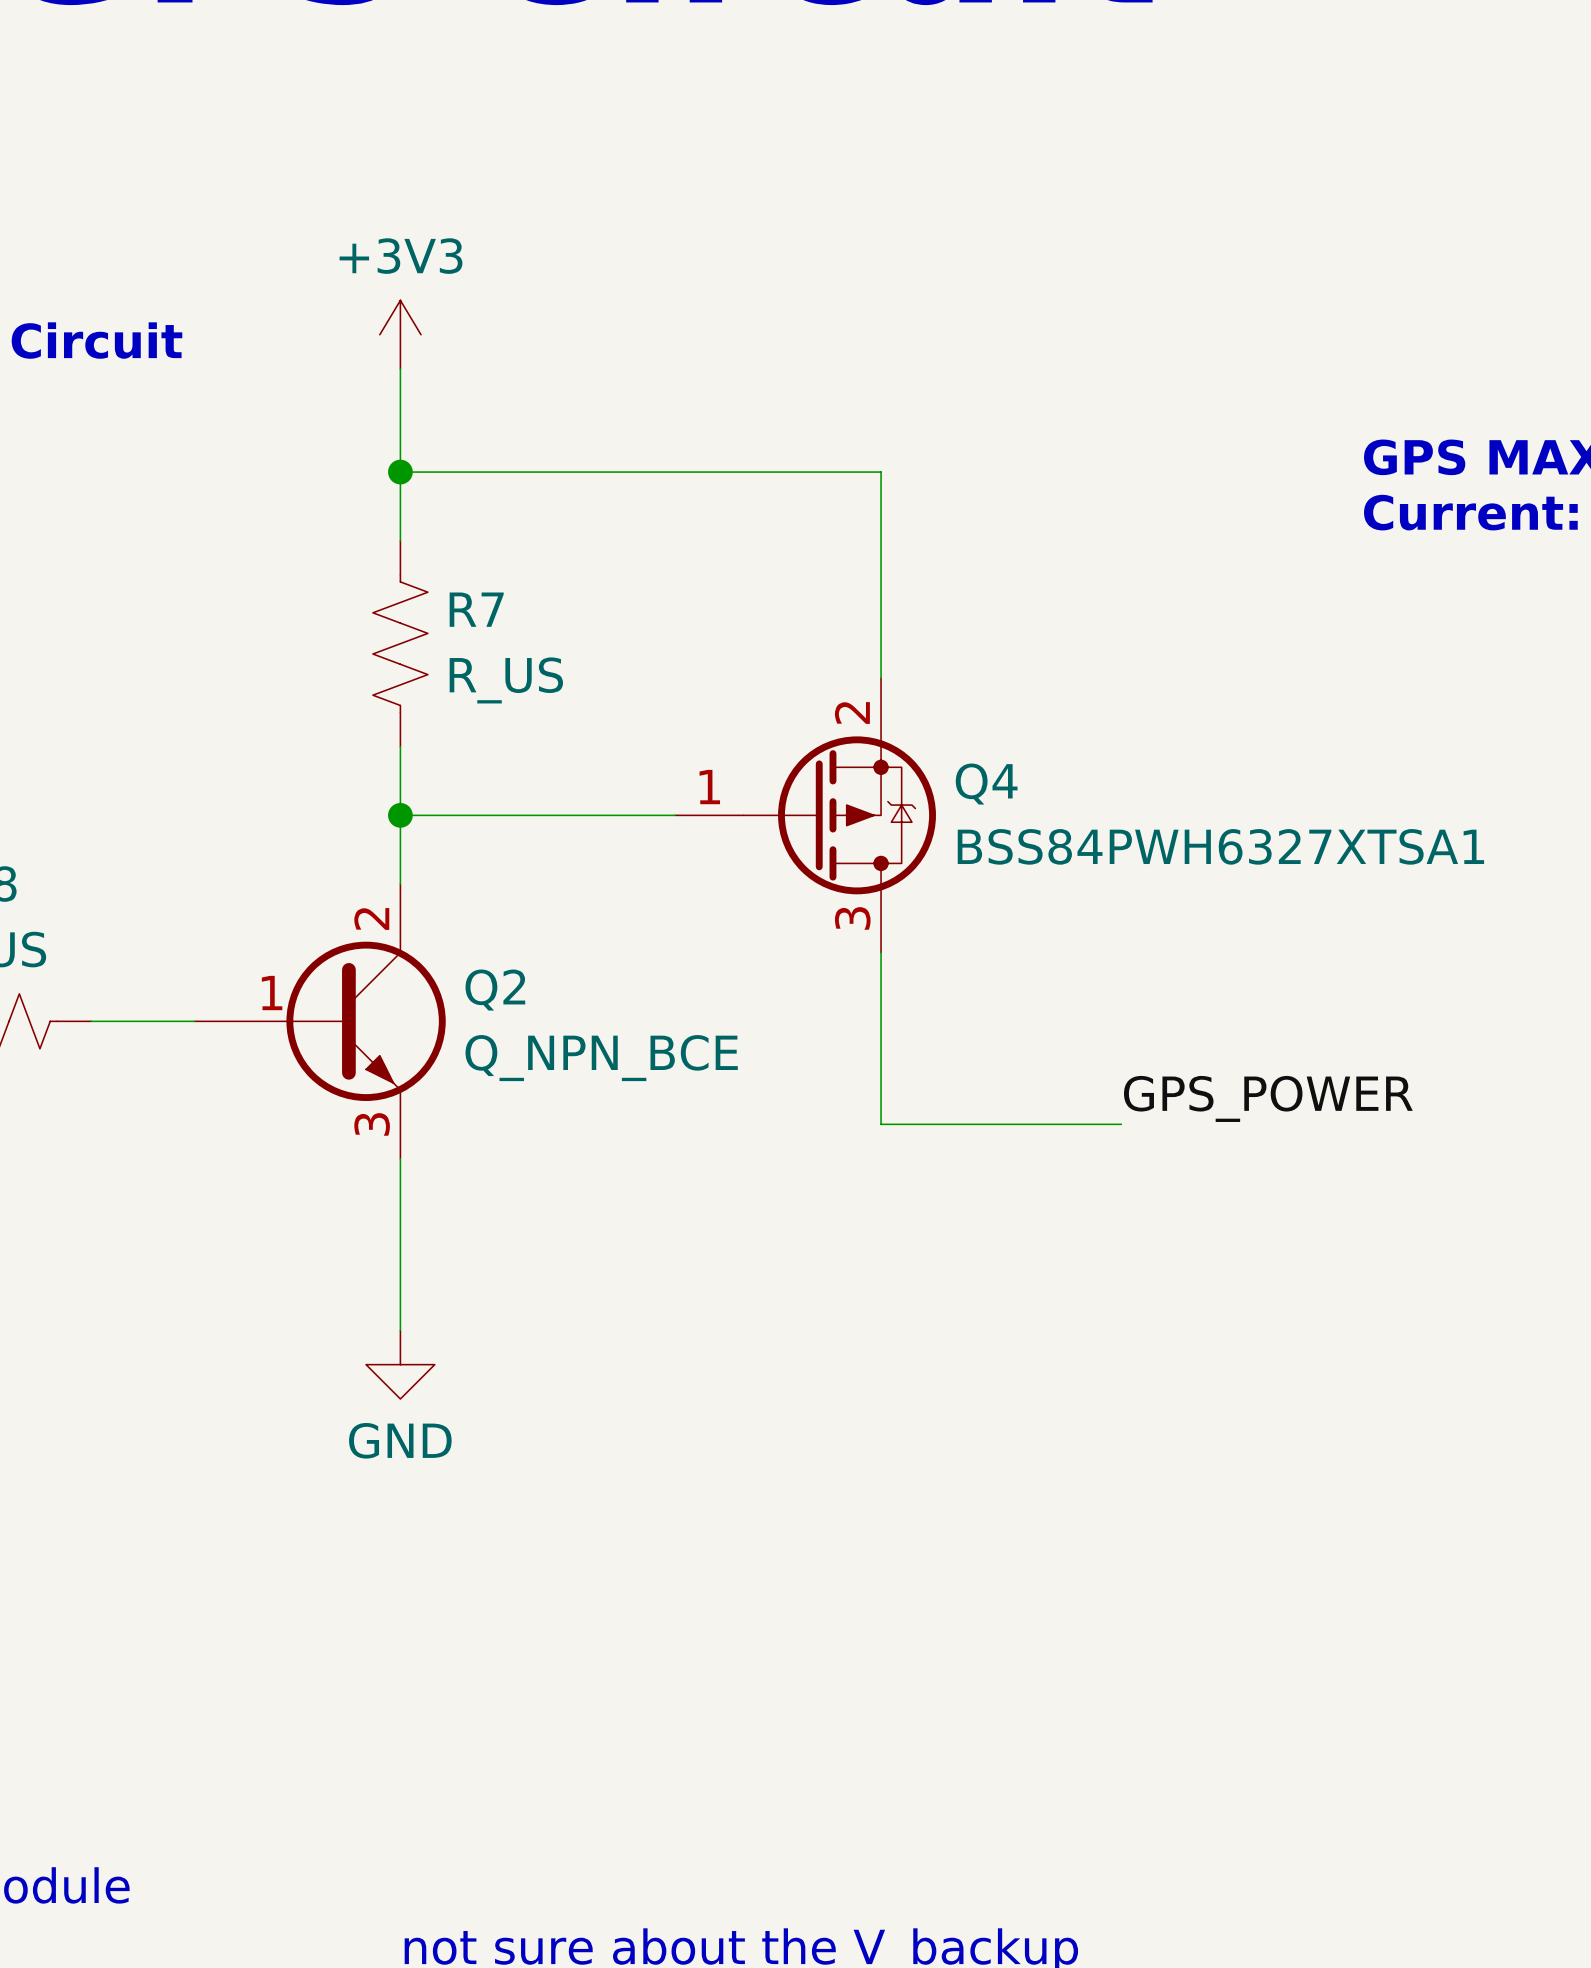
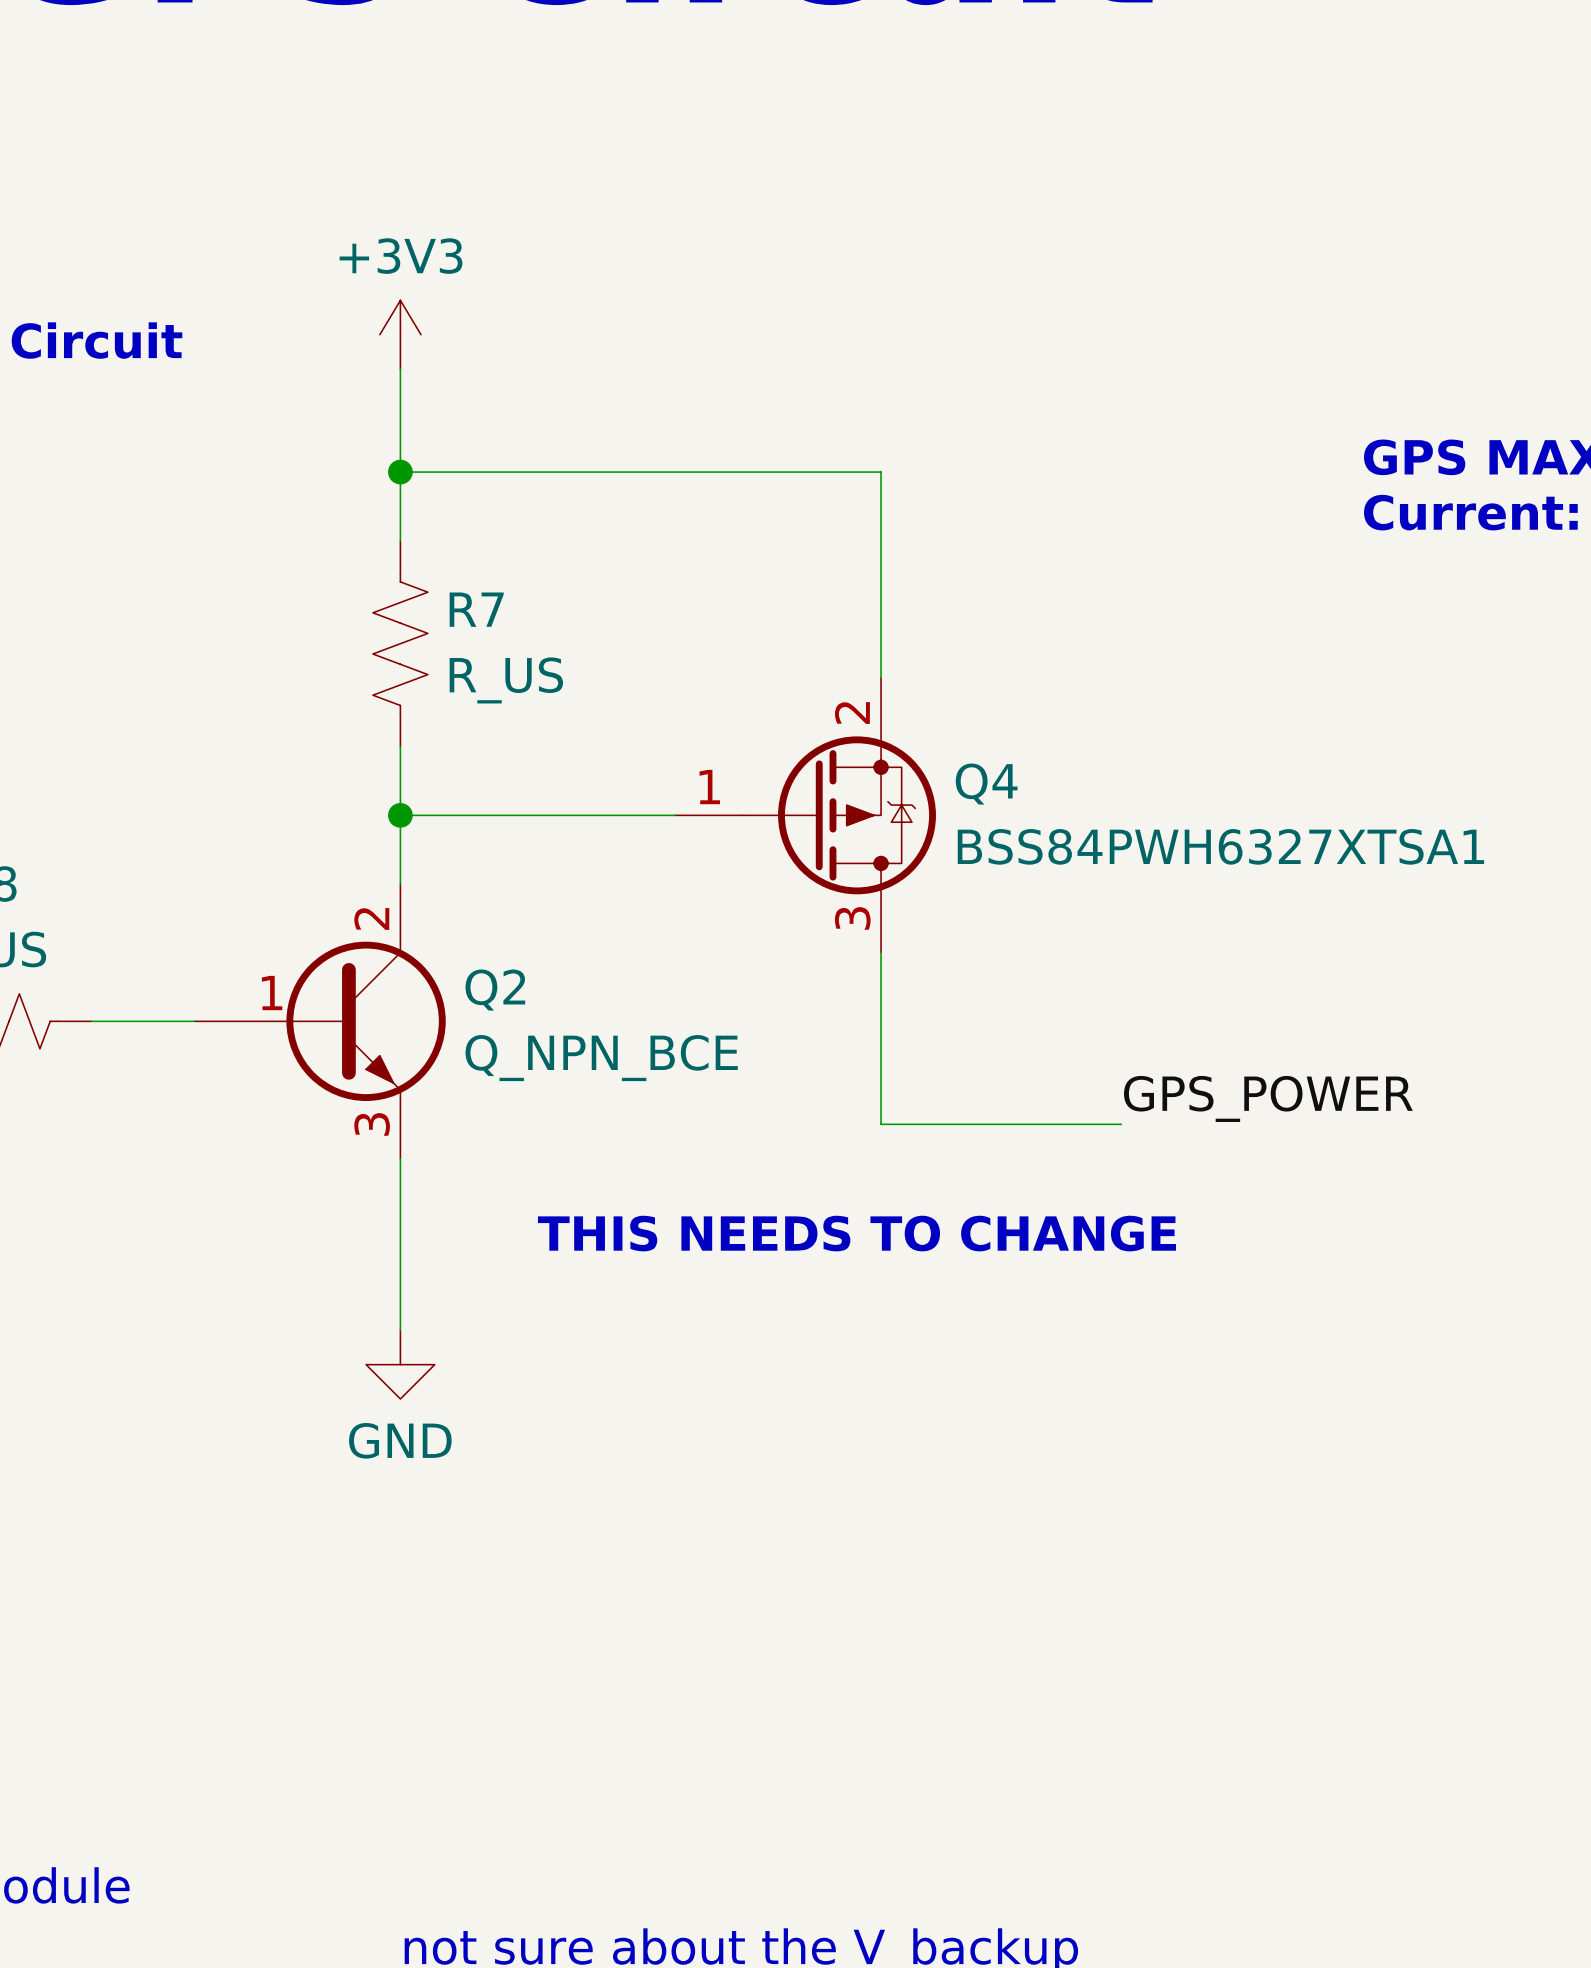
text: none -> THIS NEEDS TO CHANGE (856, 1233)

